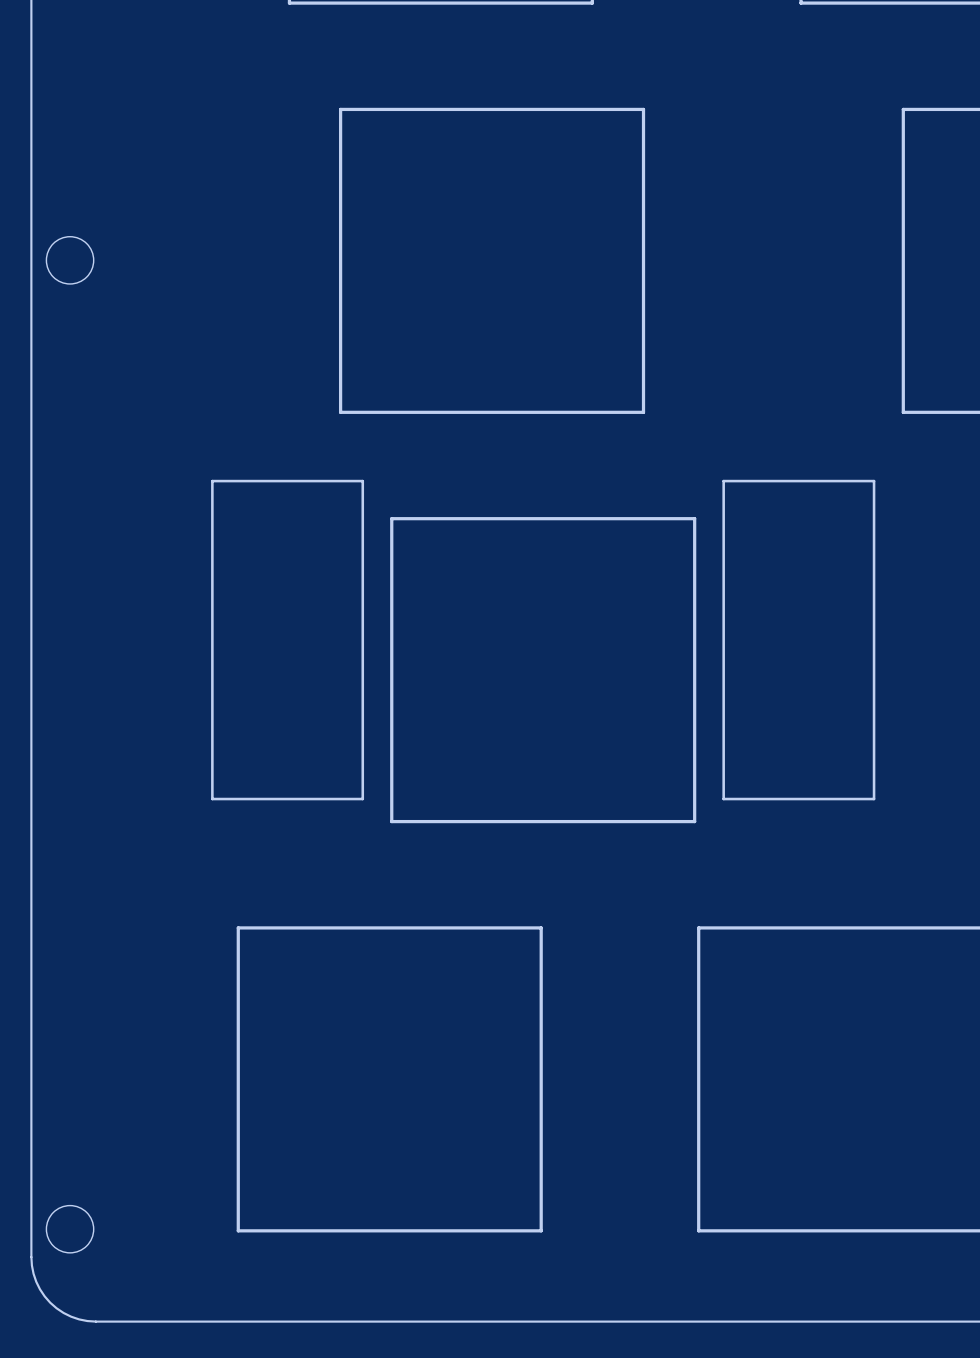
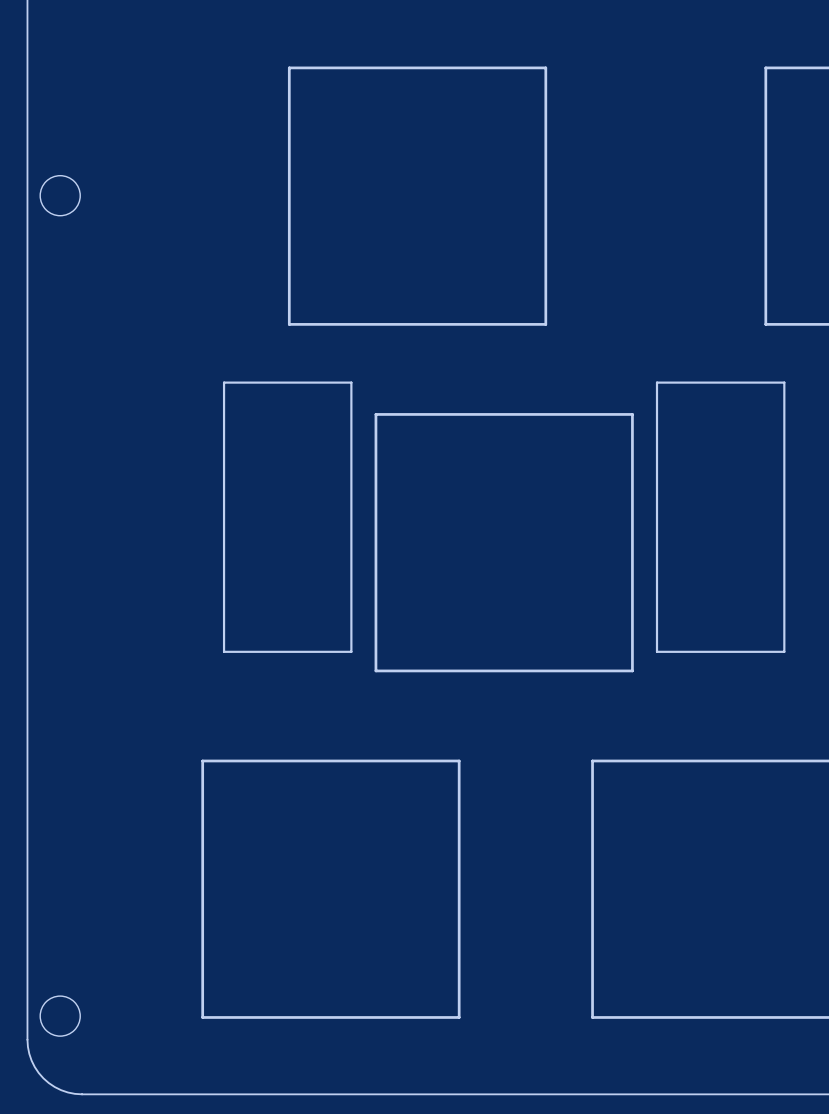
drawing position: (543, 651) -> (504, 526)

